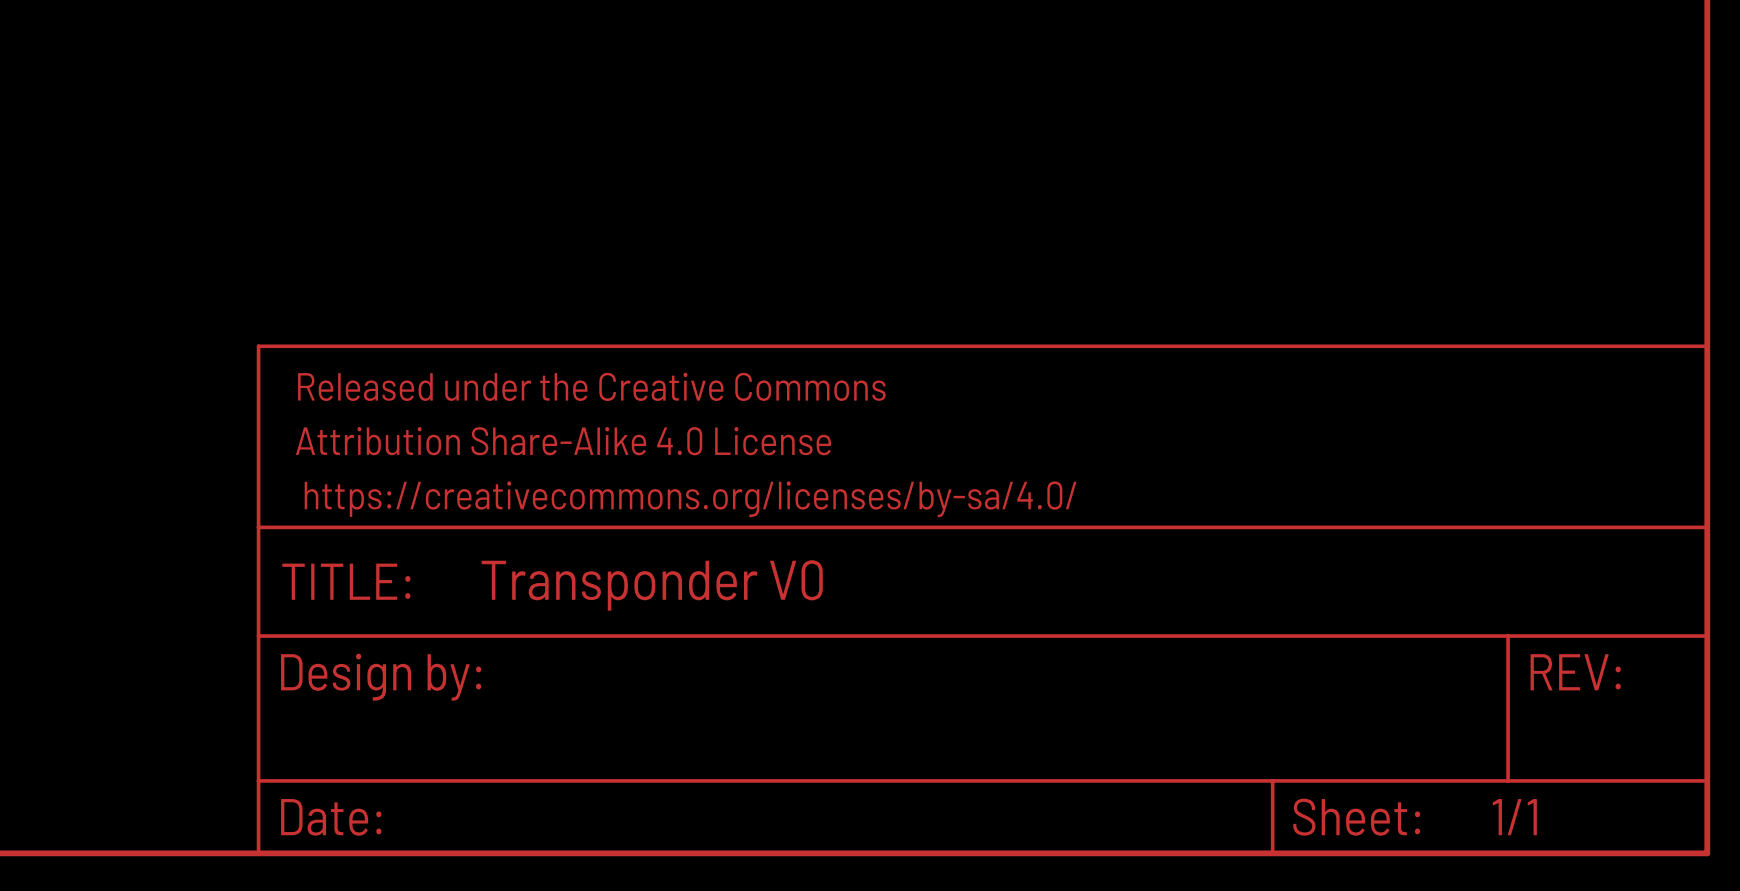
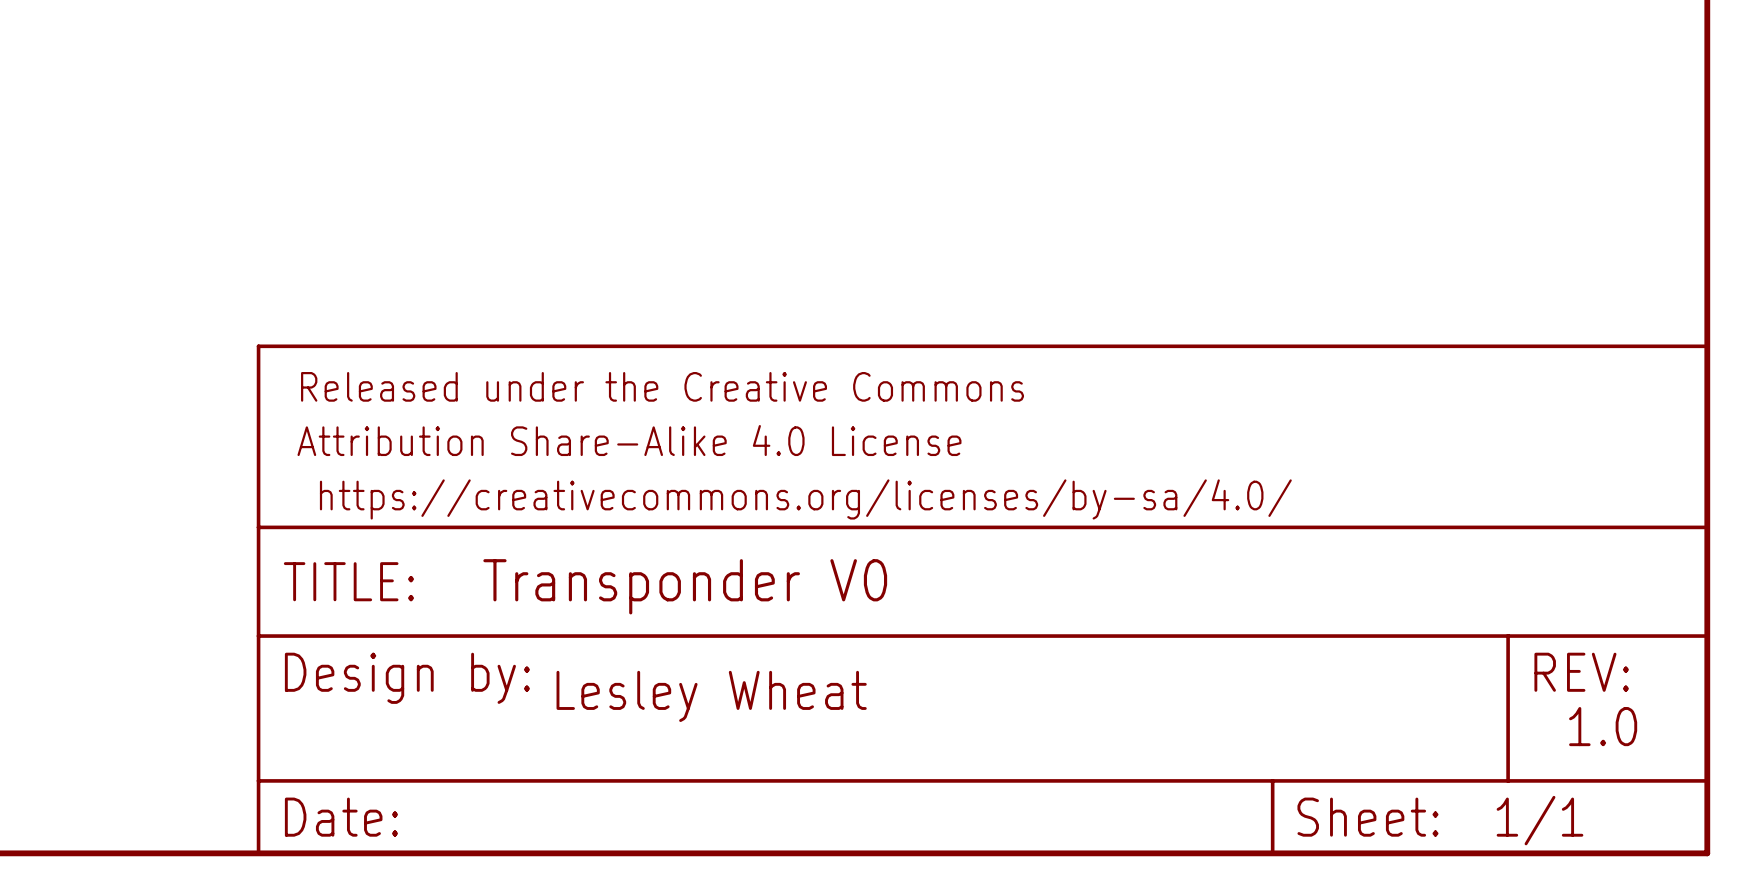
text: none -> Lesley Wheat (711, 696)
text: none -> 1.0 (1603, 726)

